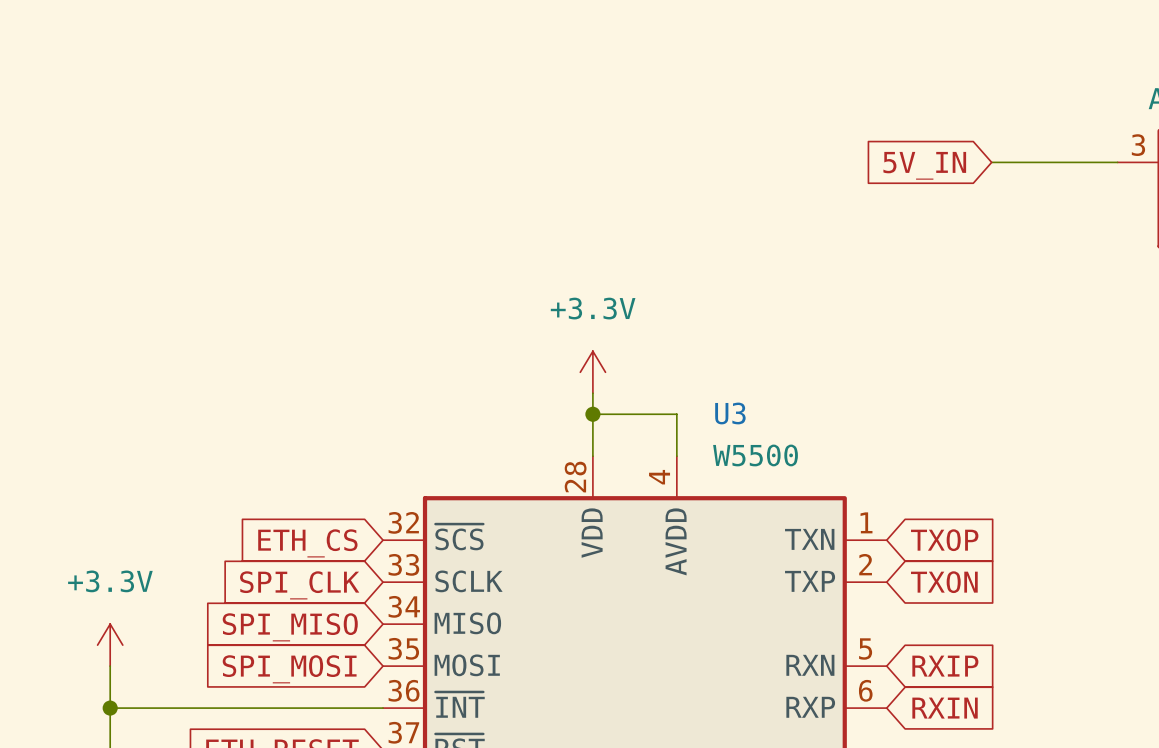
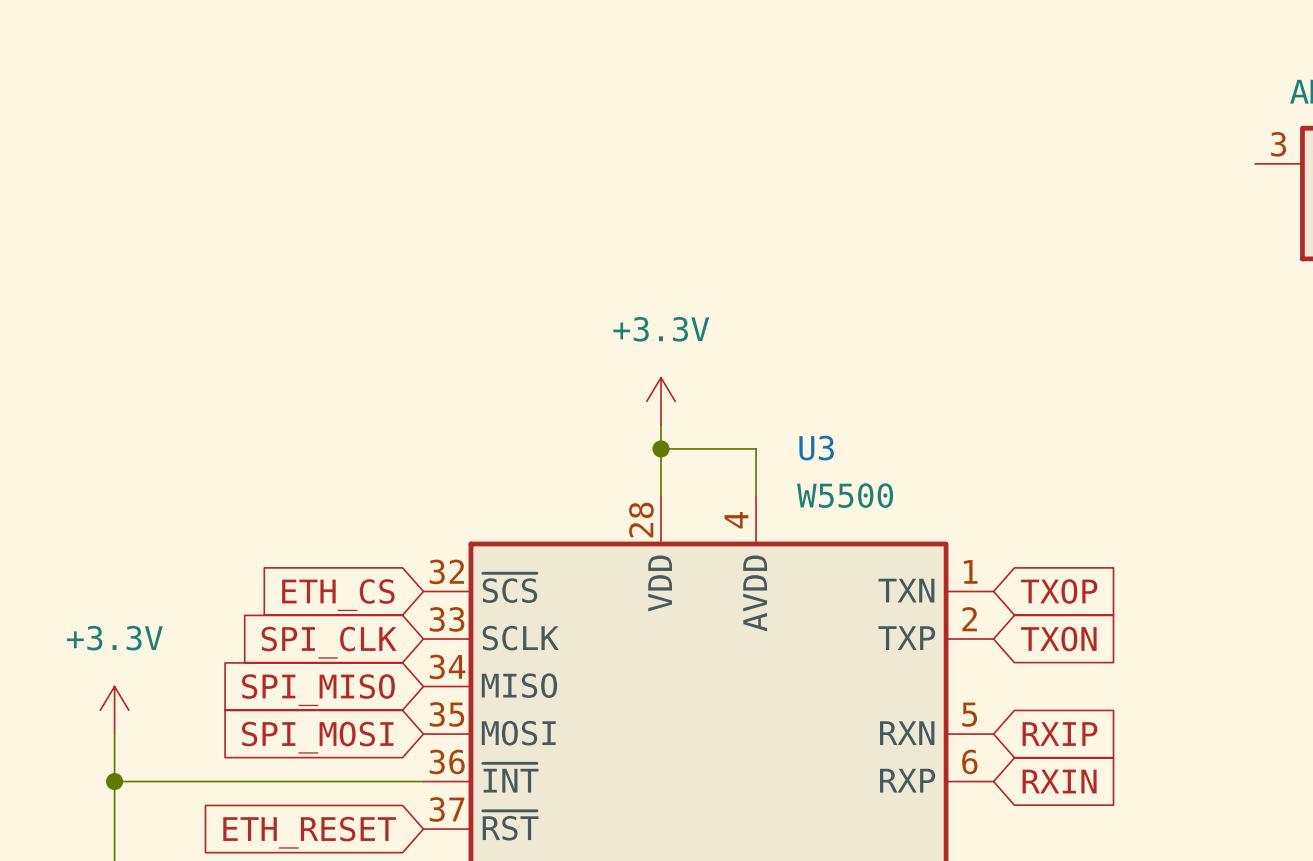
wire: (991, 162) (1117, 162) -> none
global label: 5V_IN (924, 165) -> none

